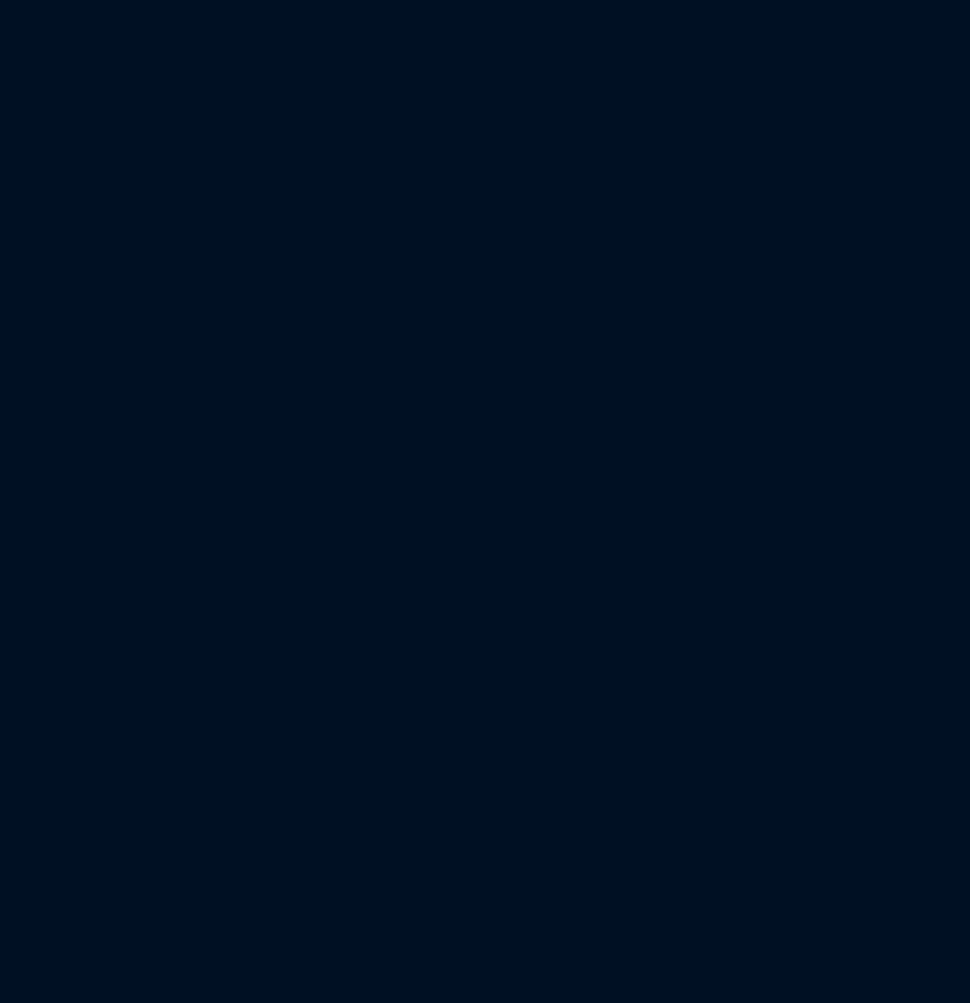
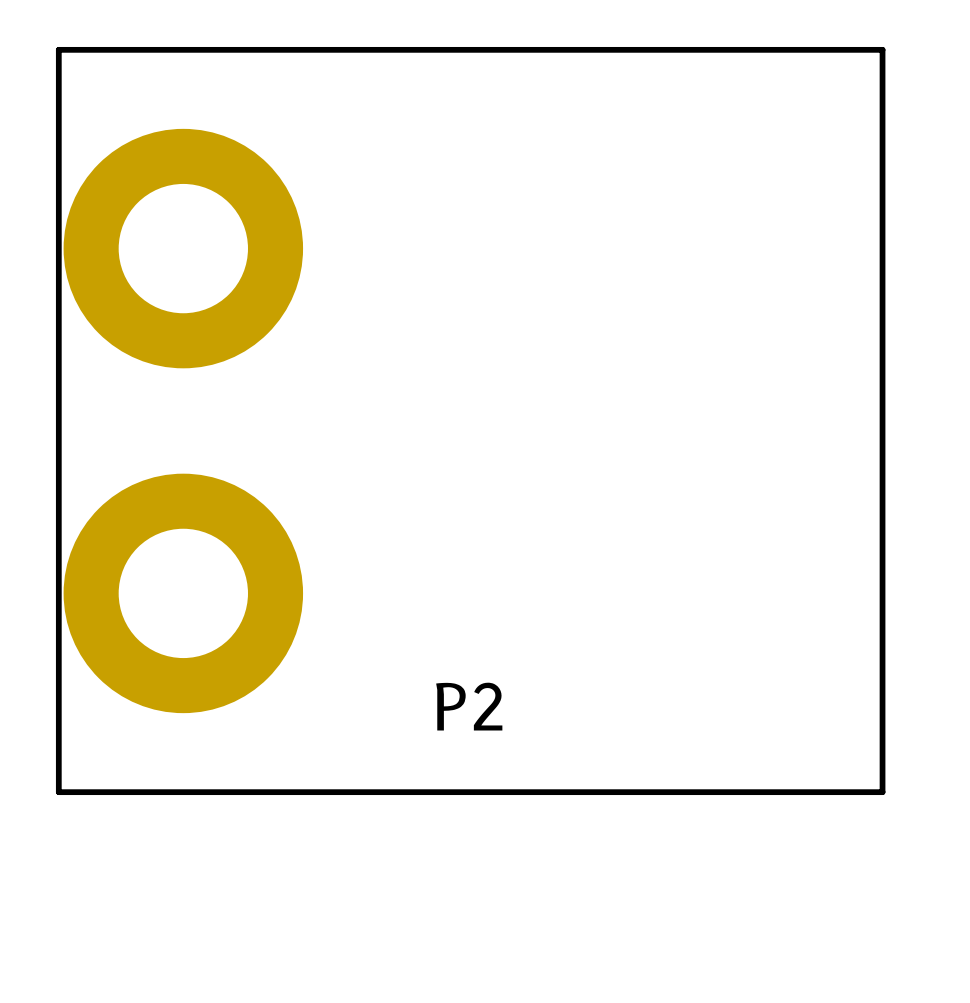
P2: none -> (470, 421)

